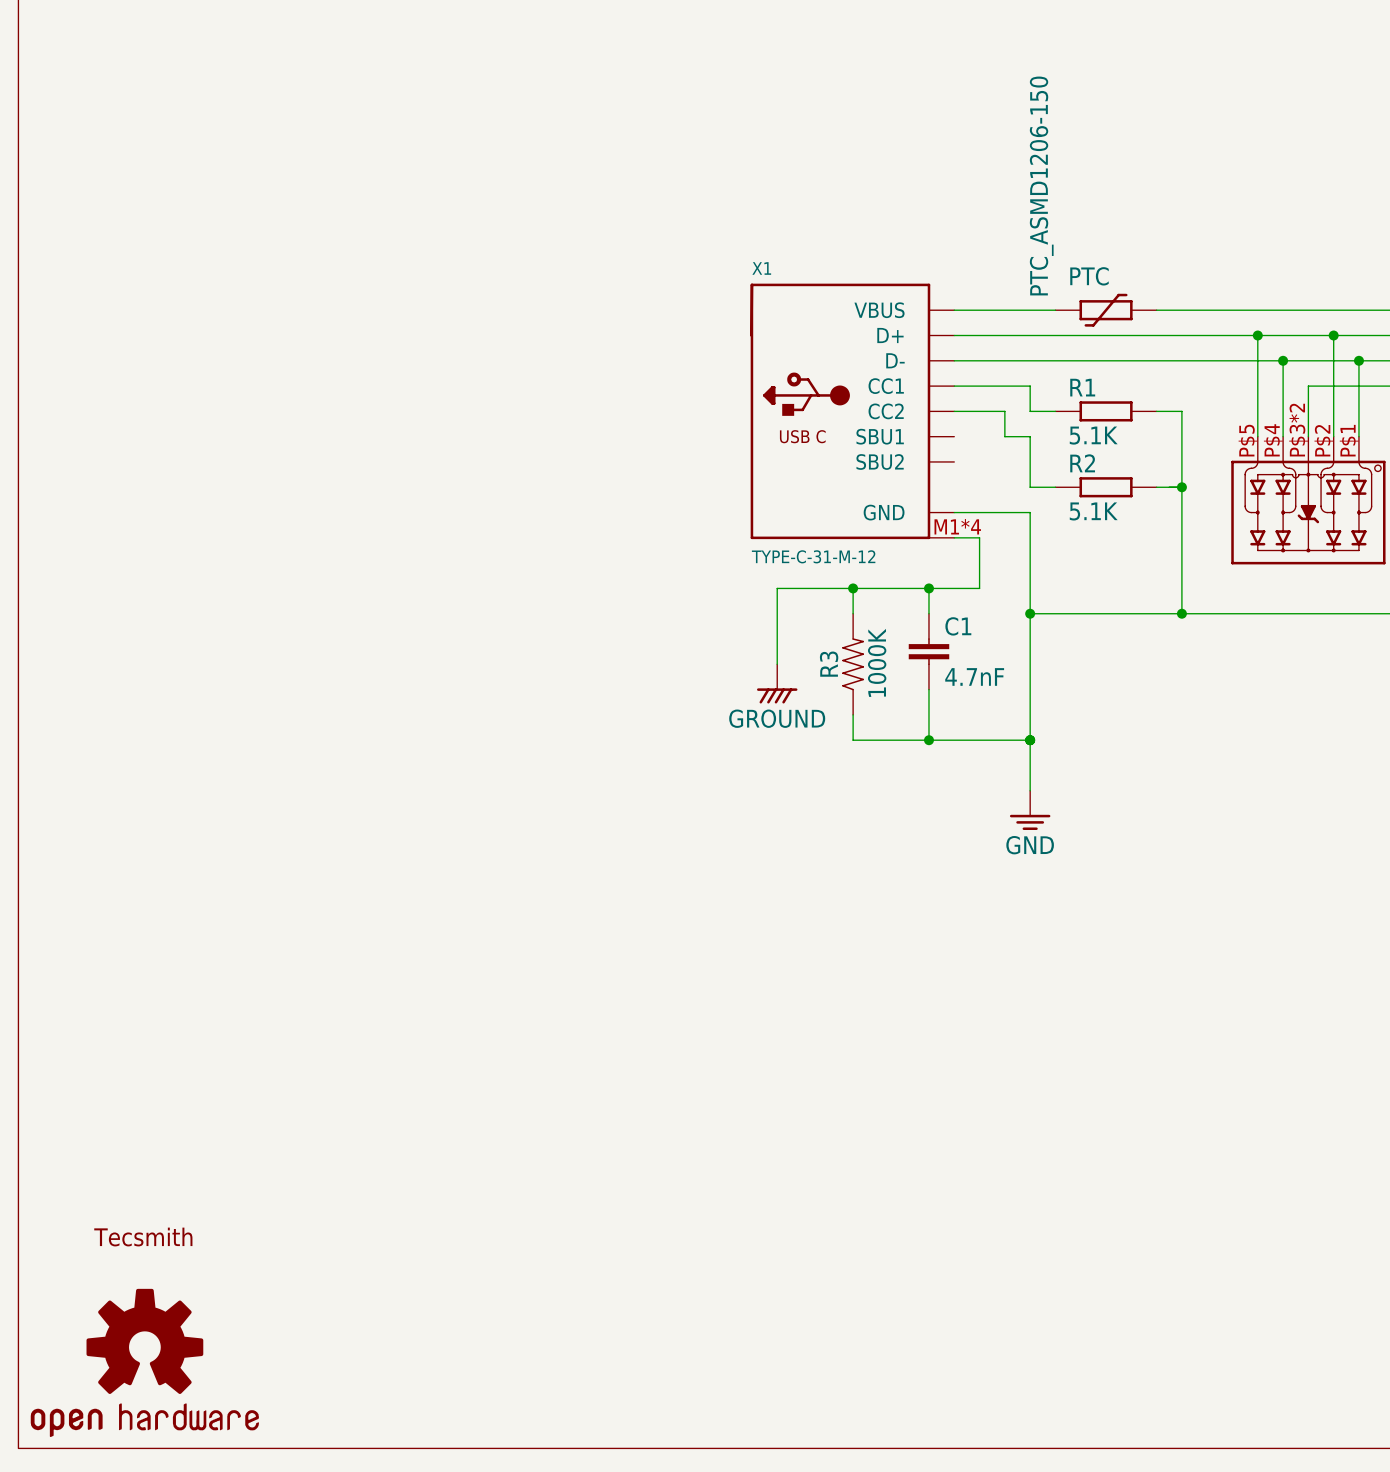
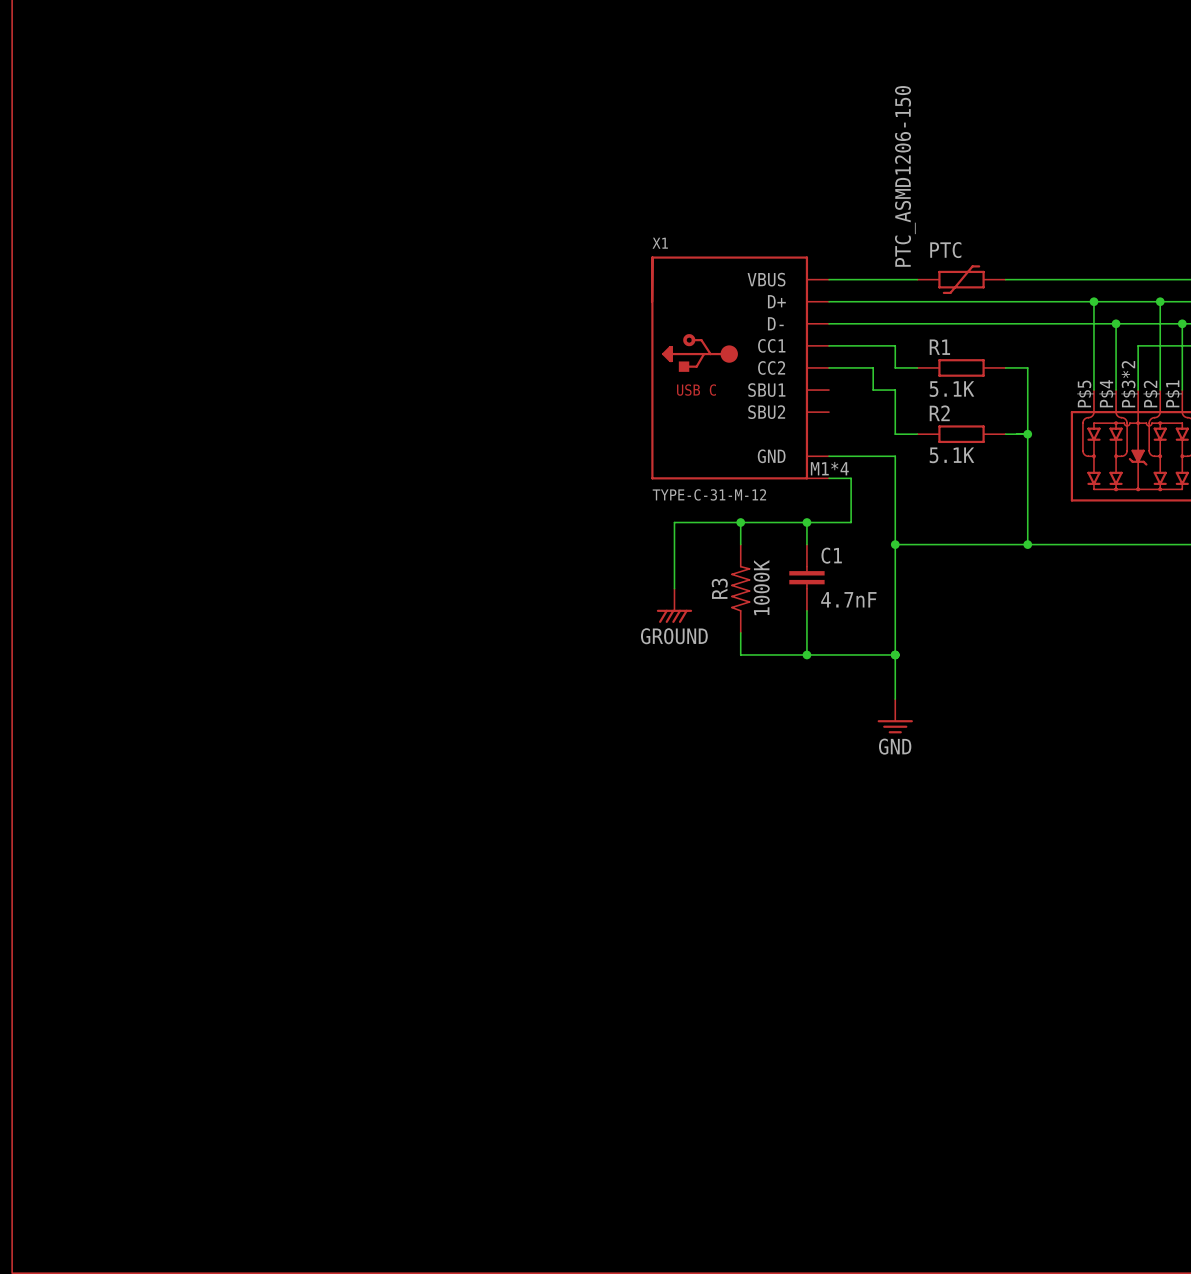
part: (143, 1237) -> none
part: (144, 1362) -> none

